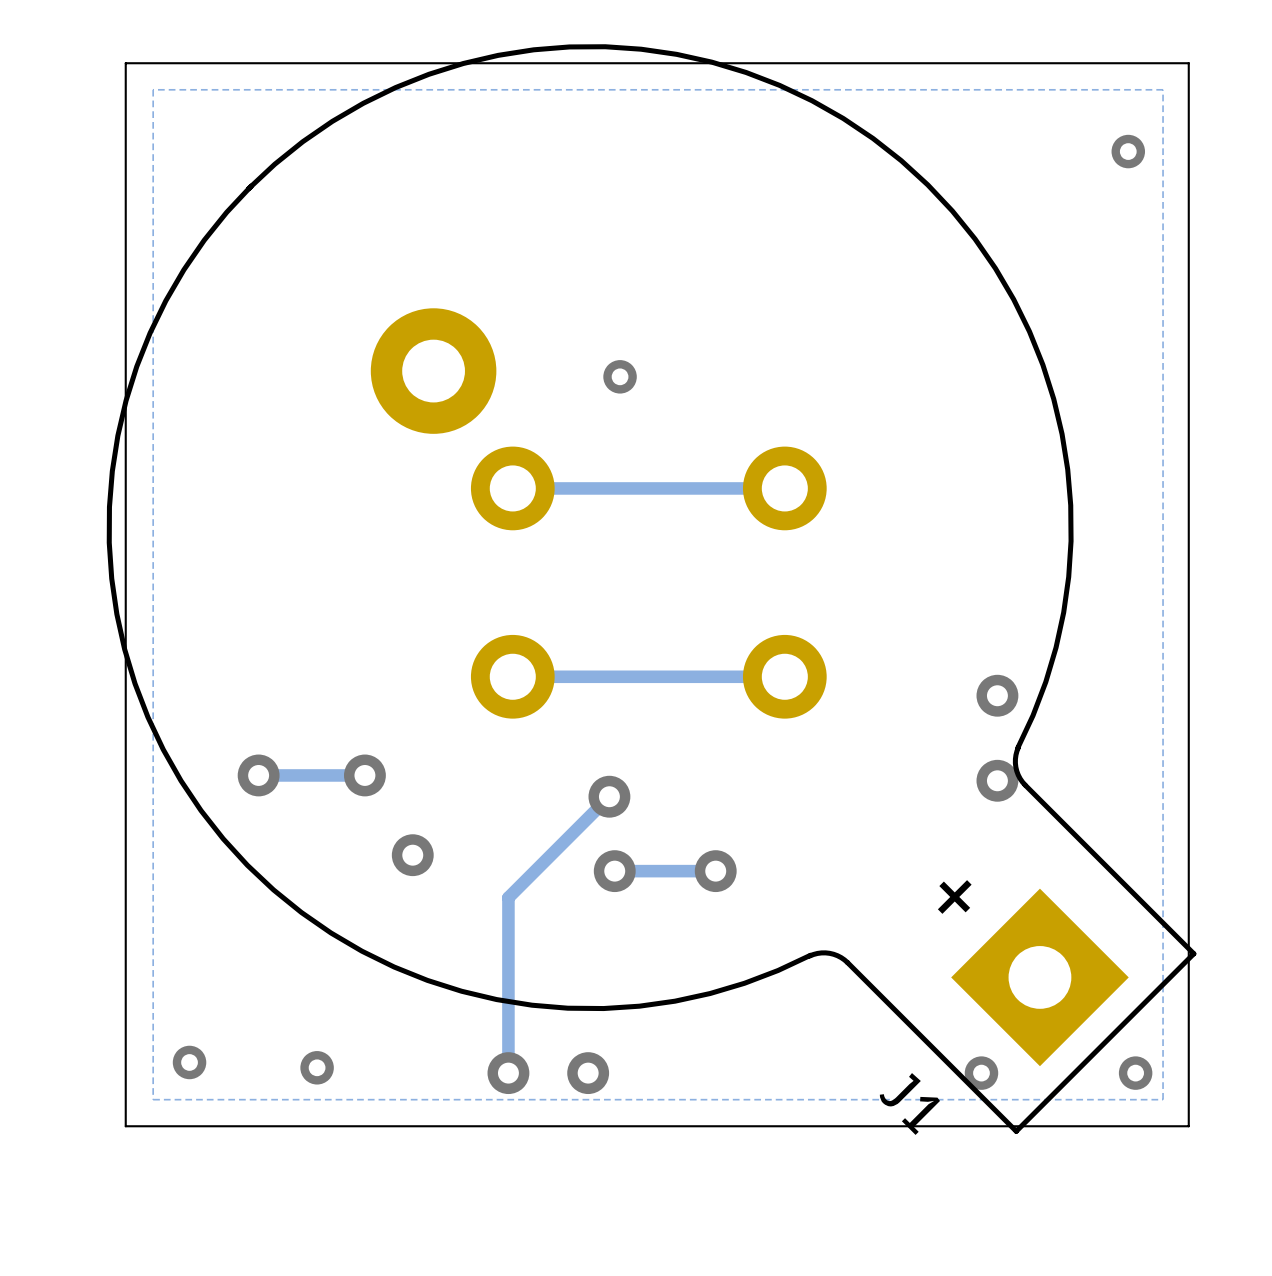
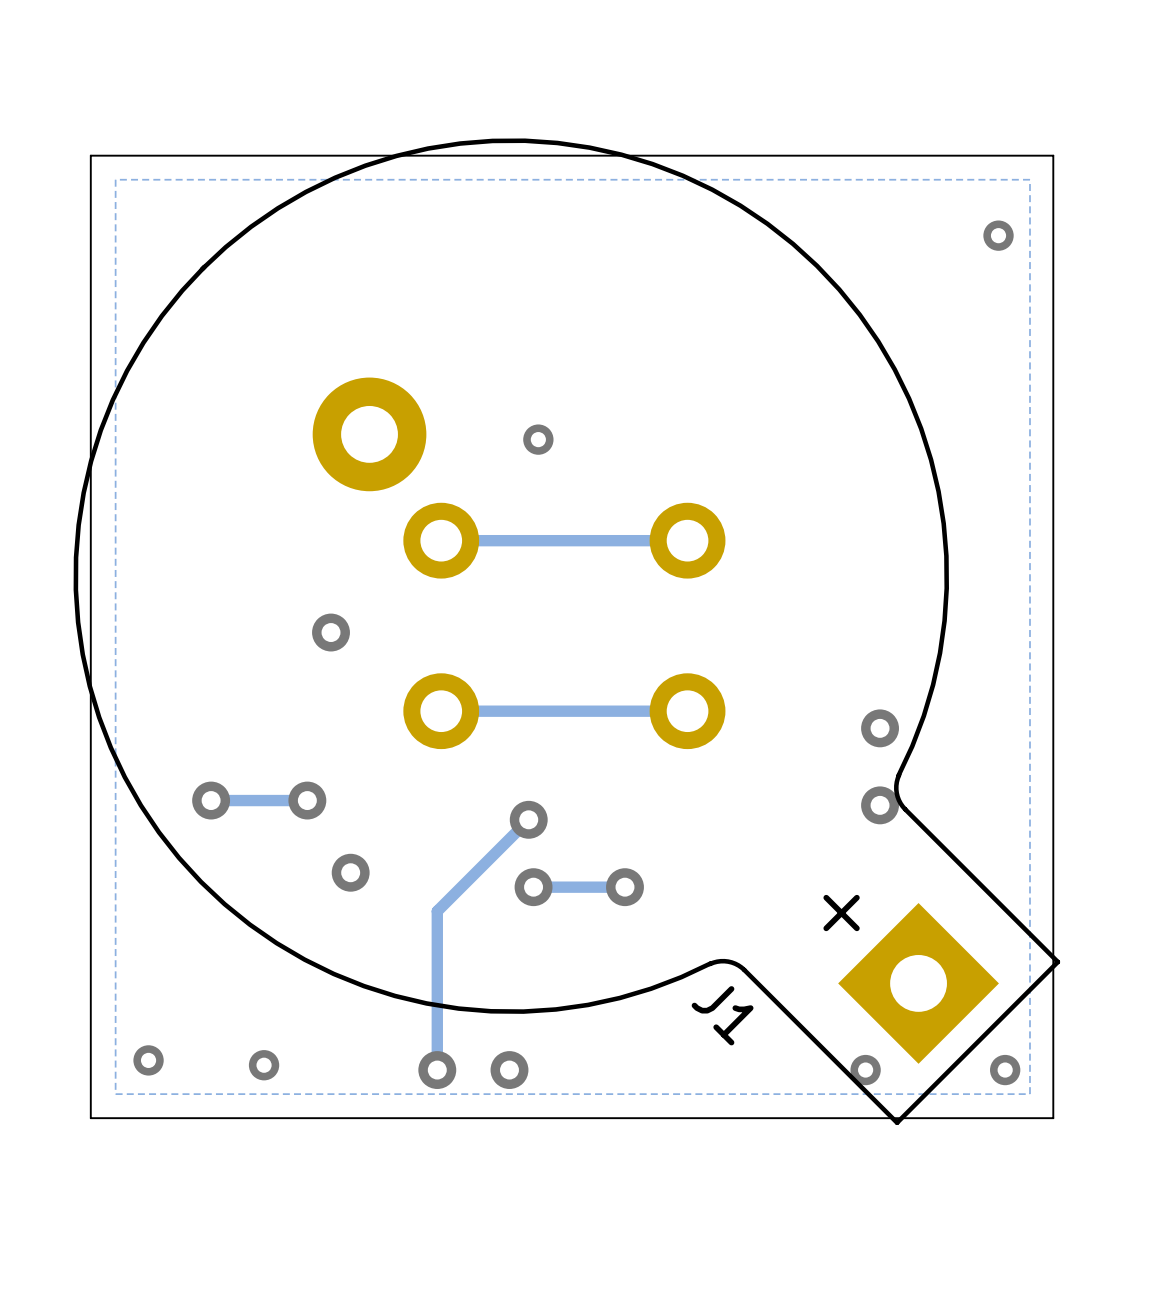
via: none -> (331, 632)
J1 name position: J1 (909, 1104) -> J1 (722, 1015)

